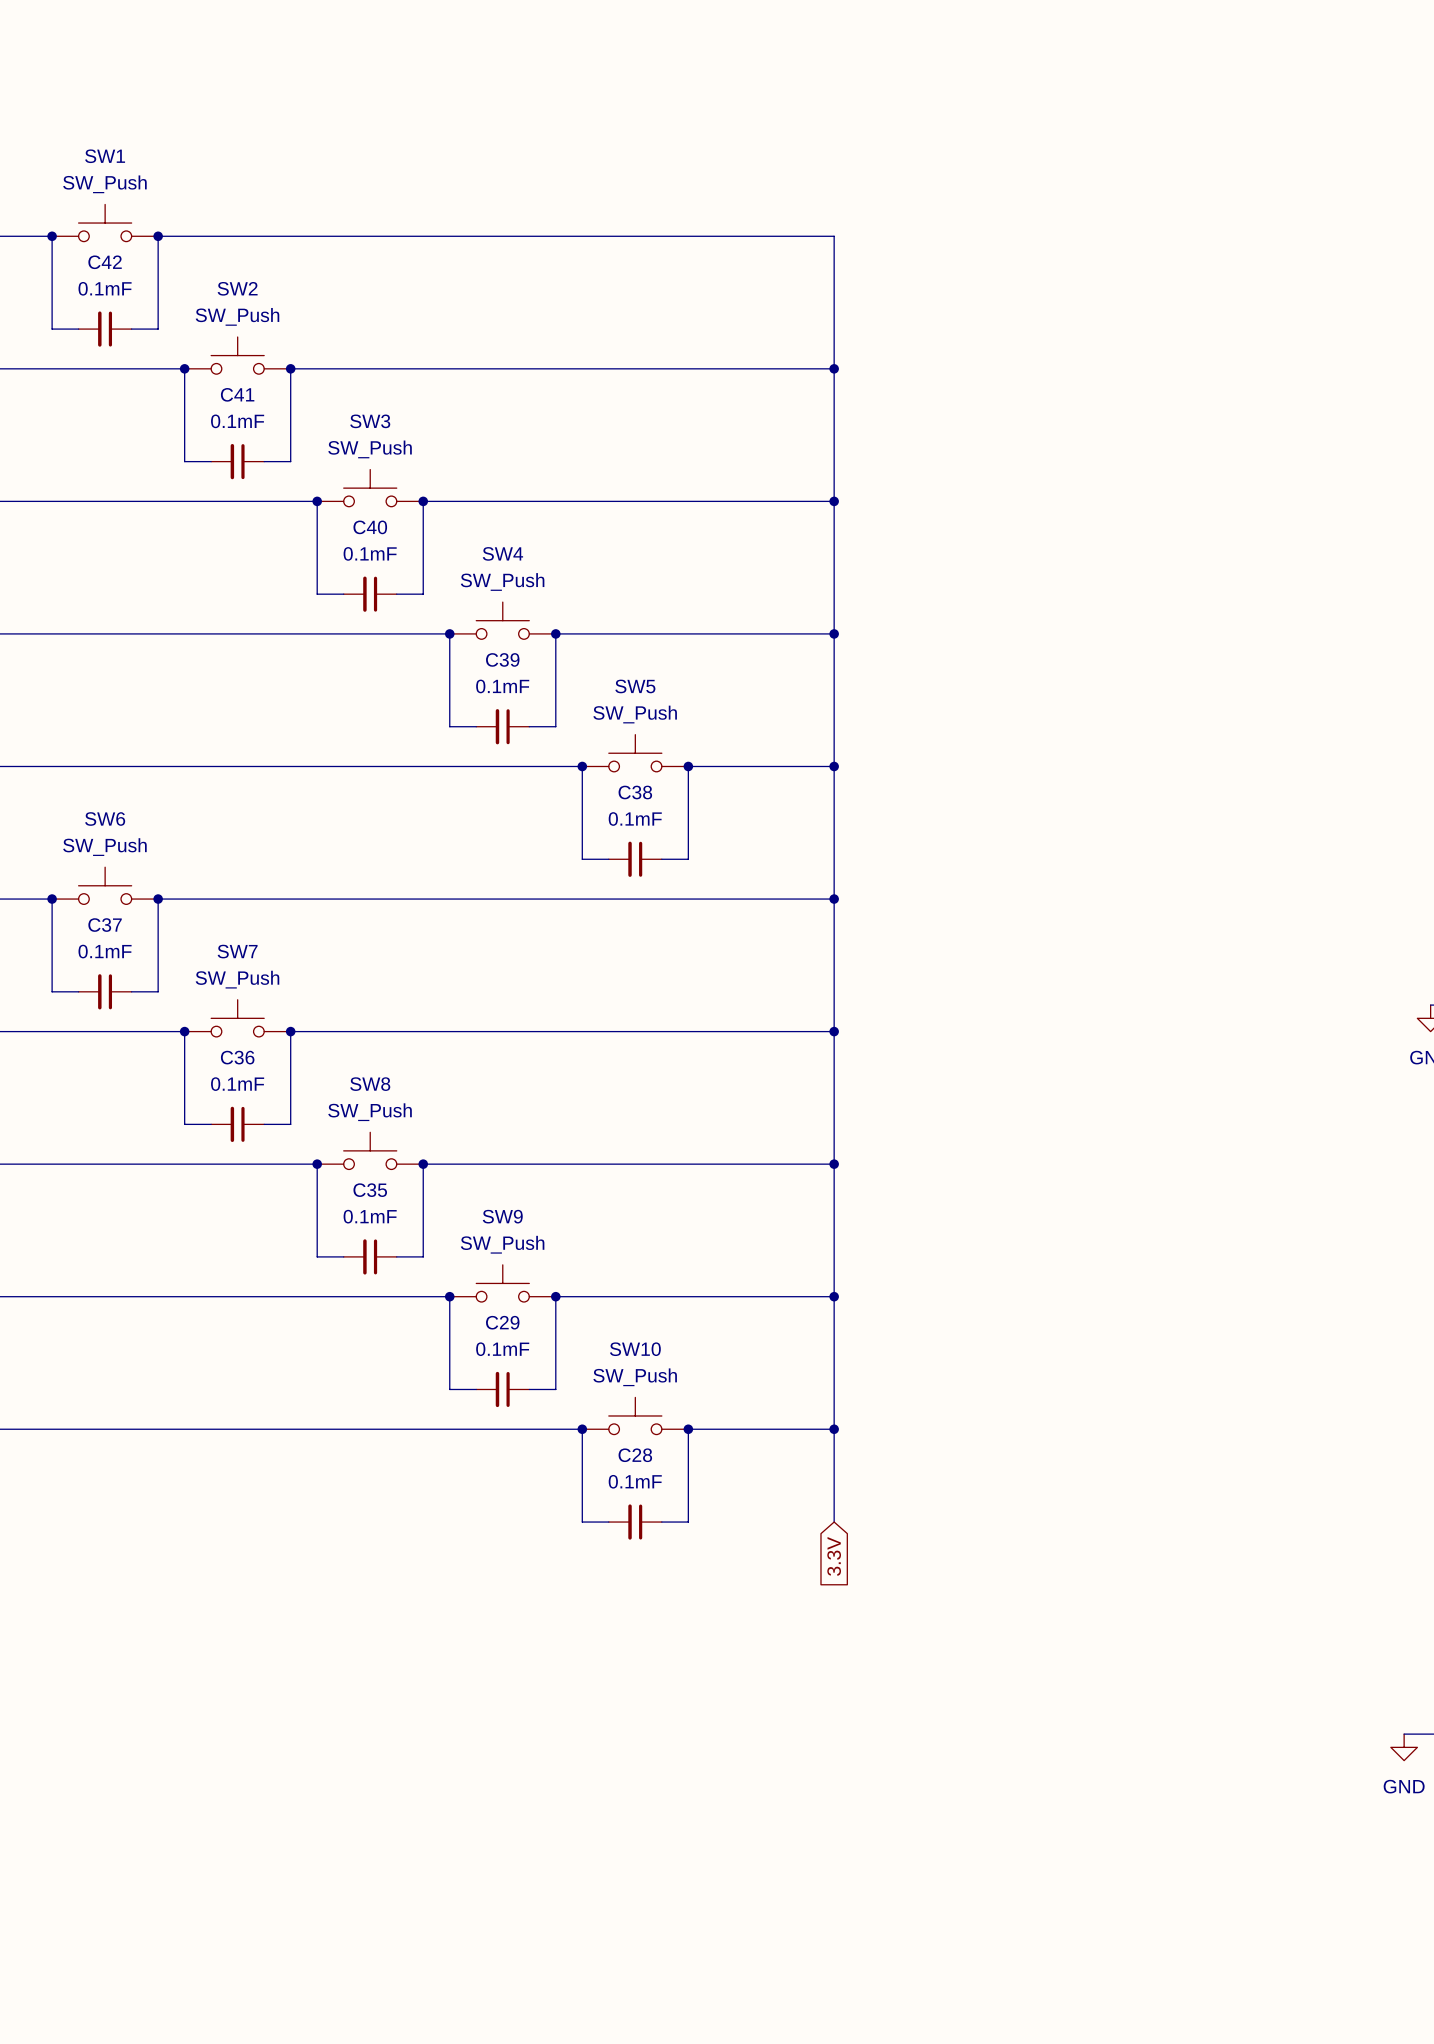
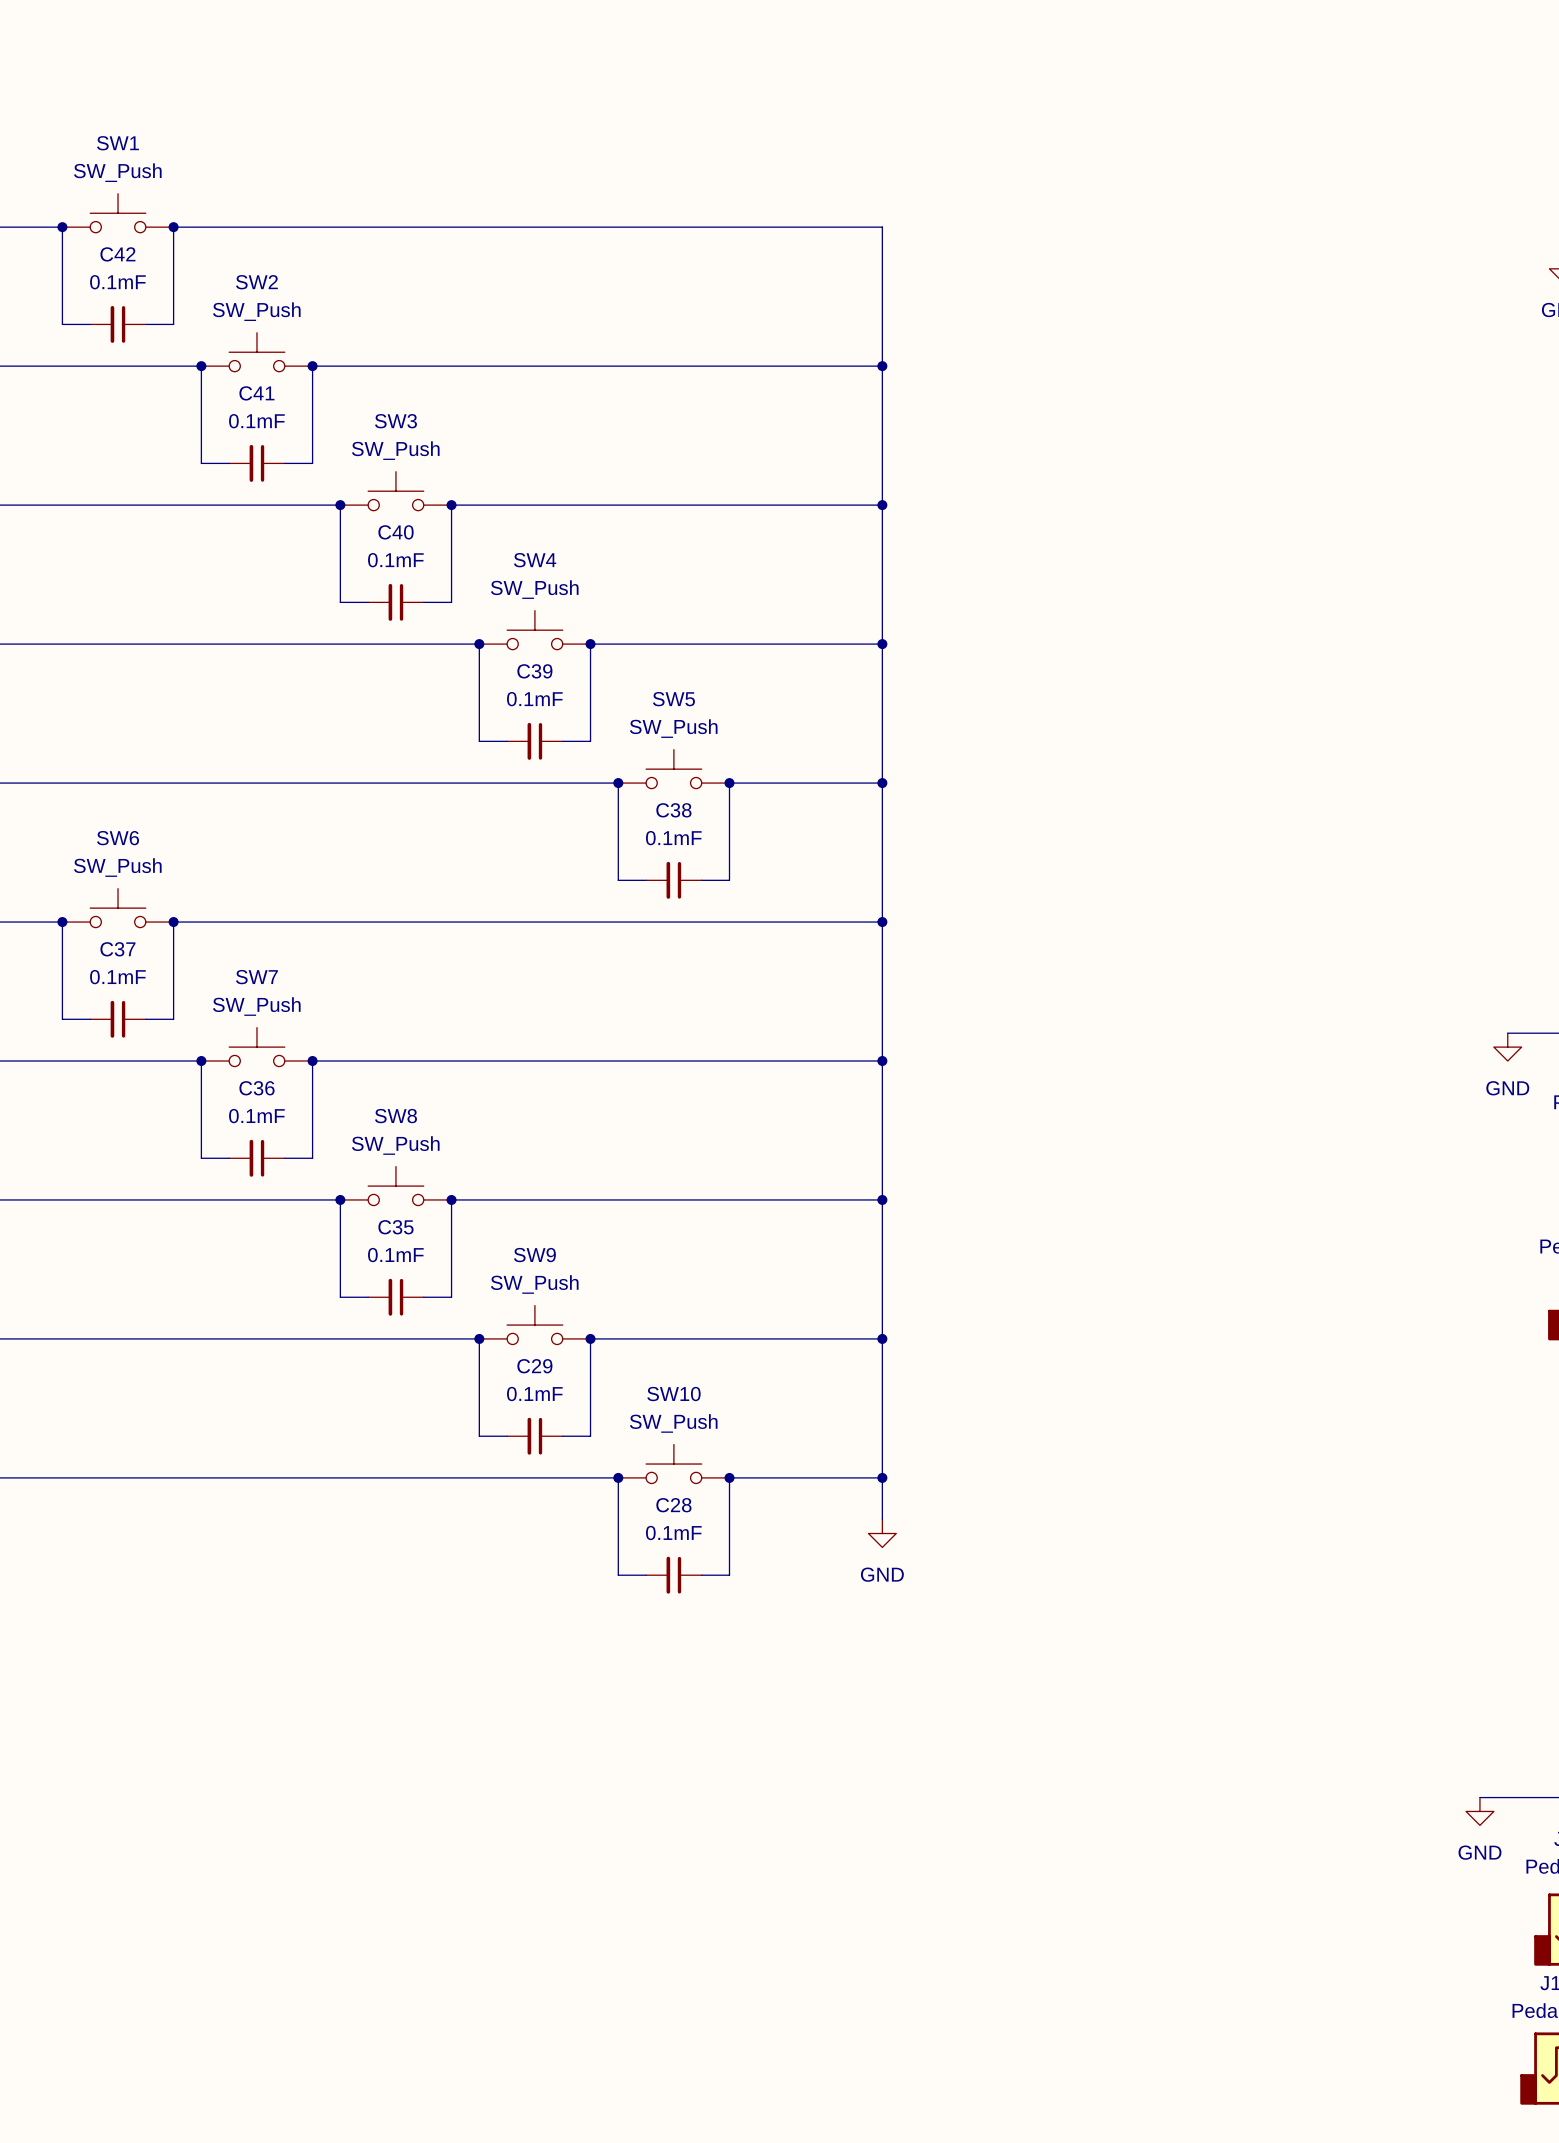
wire: (834, 1469) (834, 1522) -> none
power symbol: none -> GND (882, 1533)
global label: 3.3V (834, 1556) -> none

